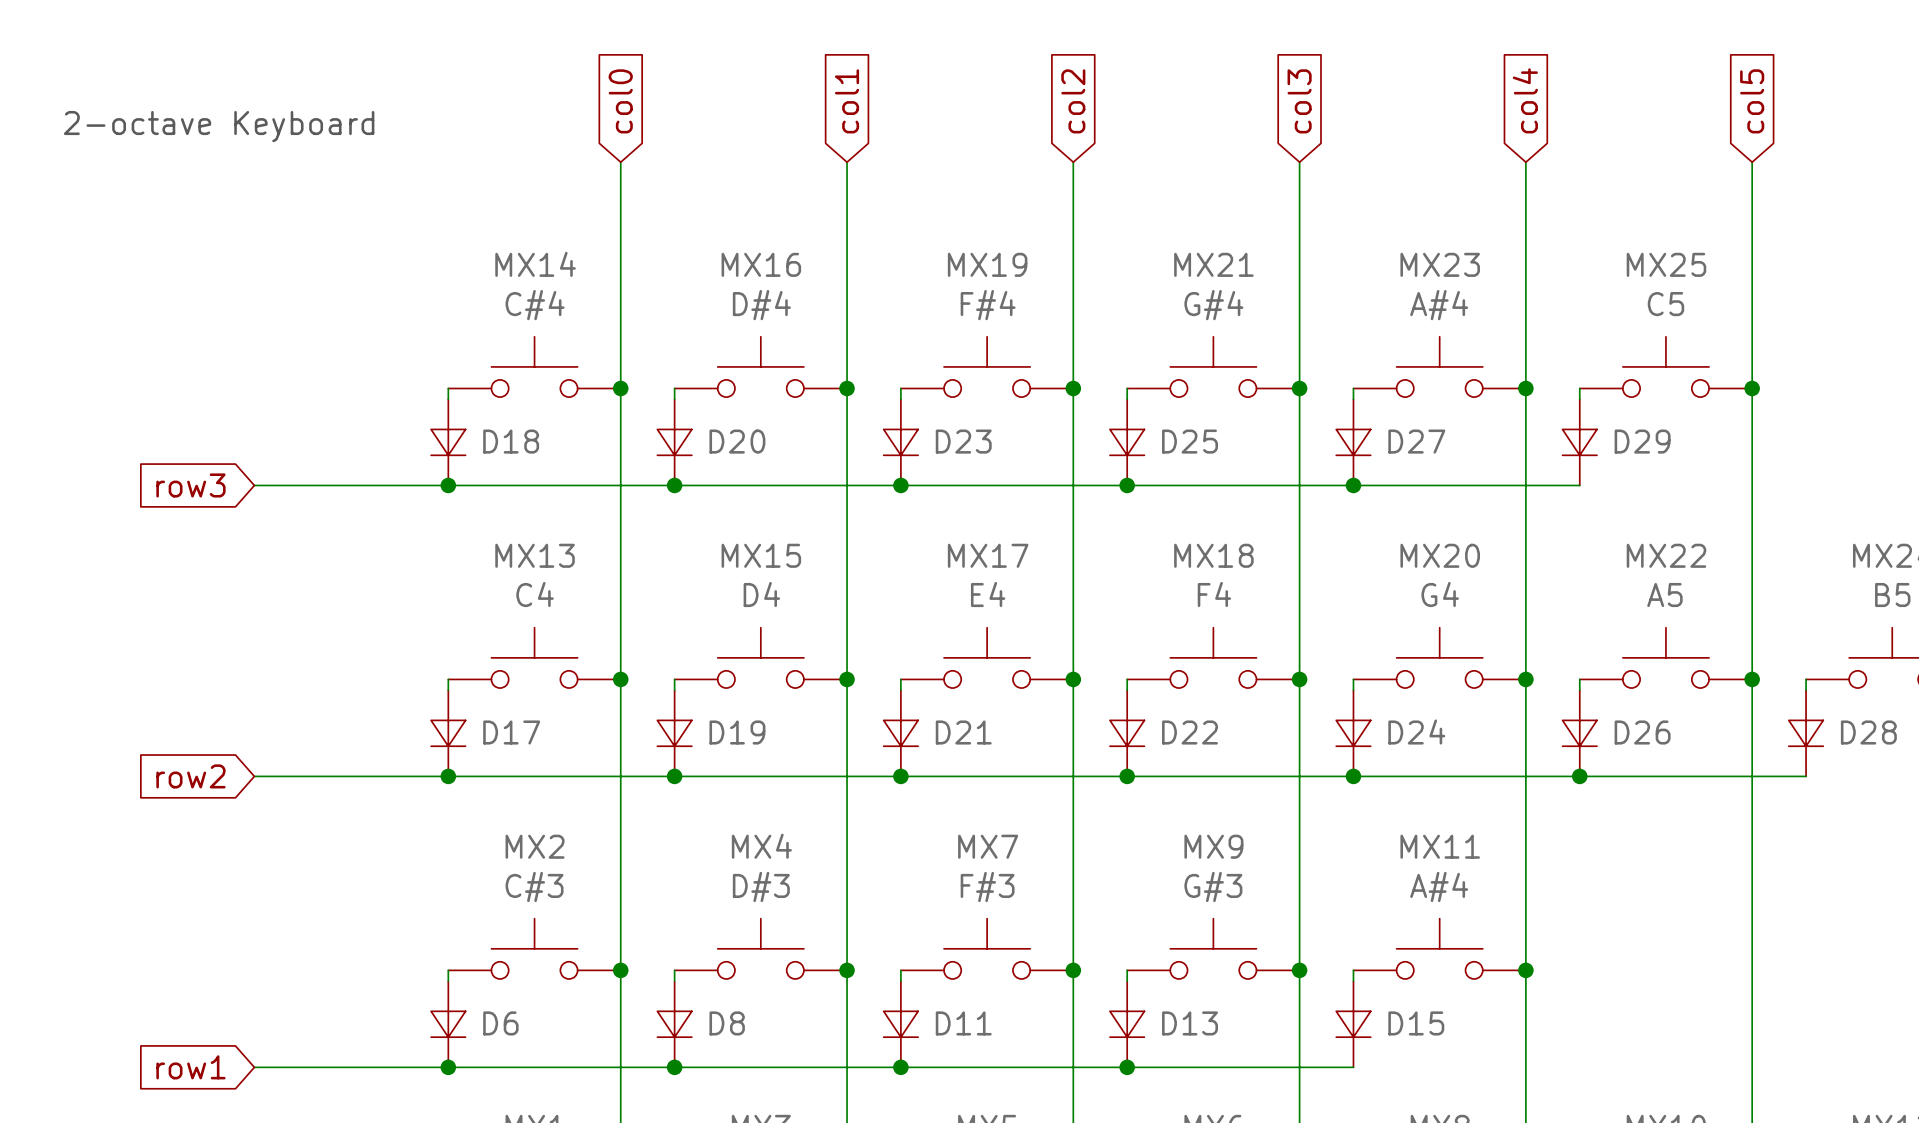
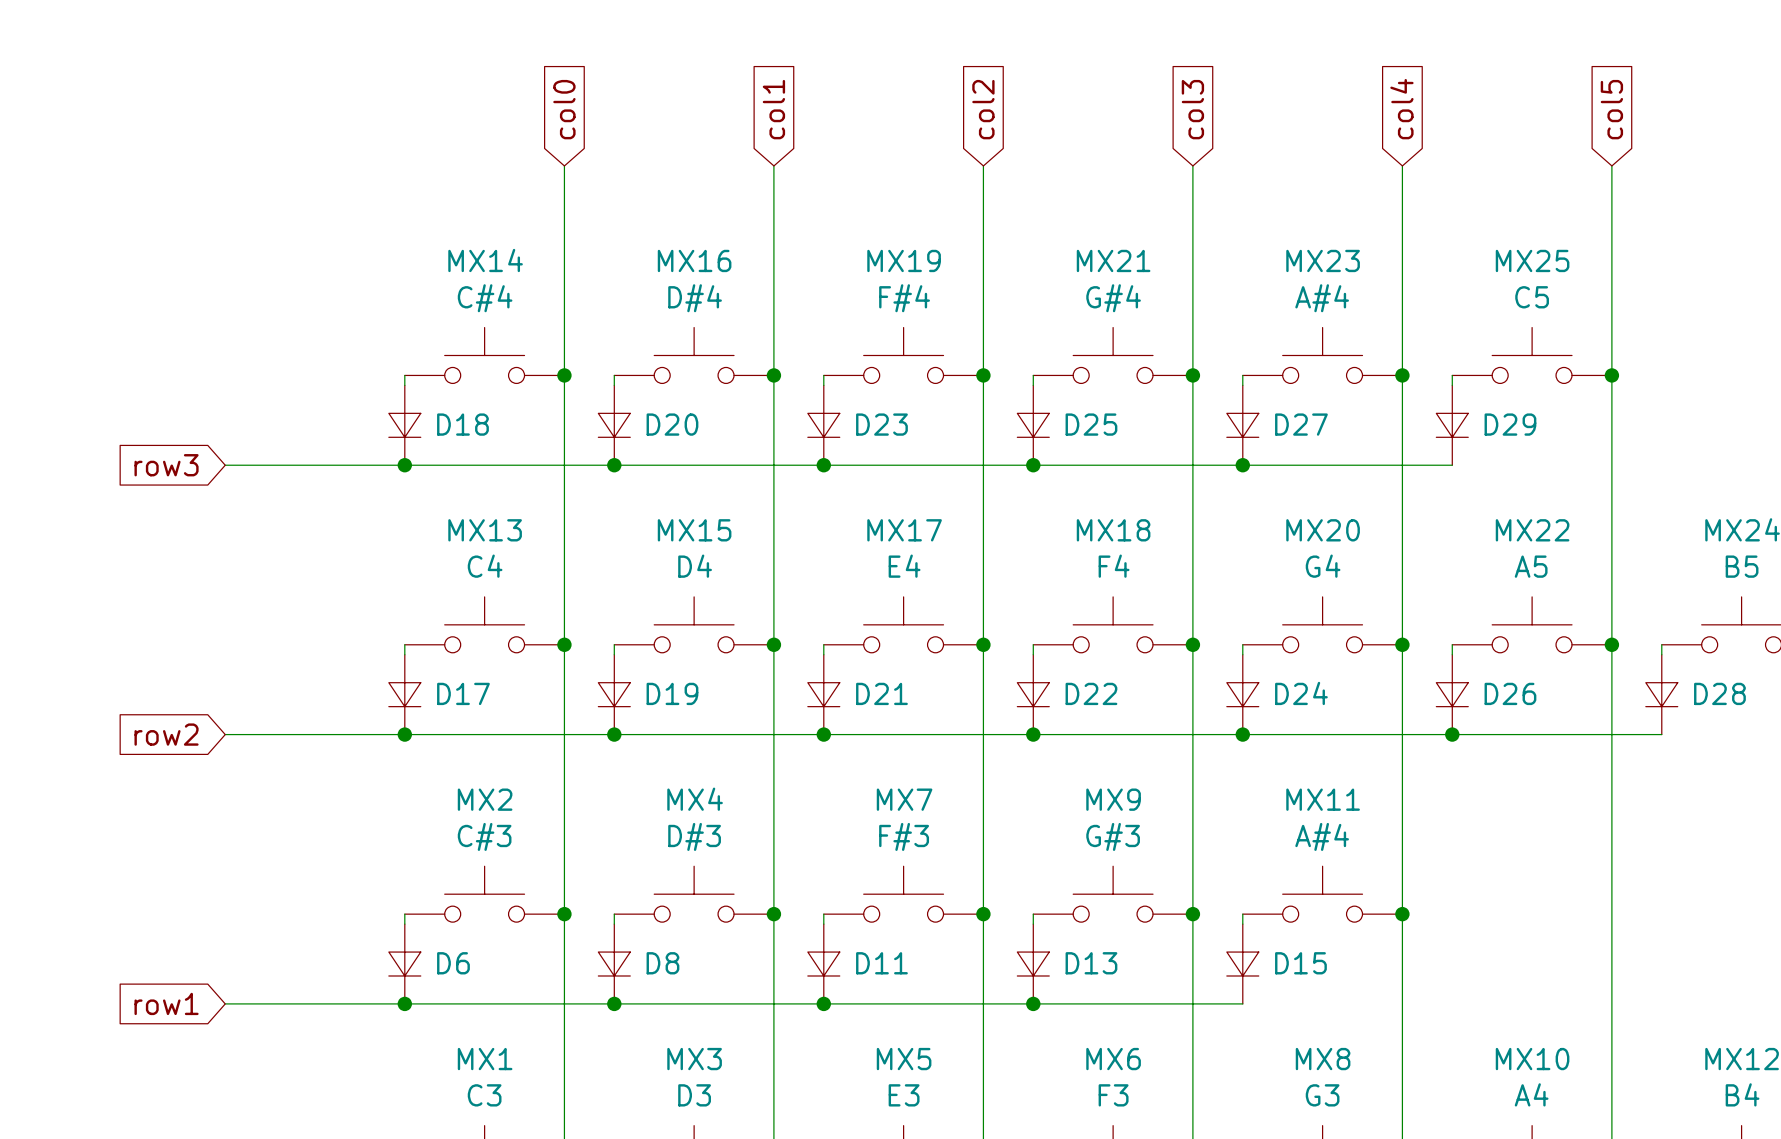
text: 2-octave Keyboard (219, 126) -> none

